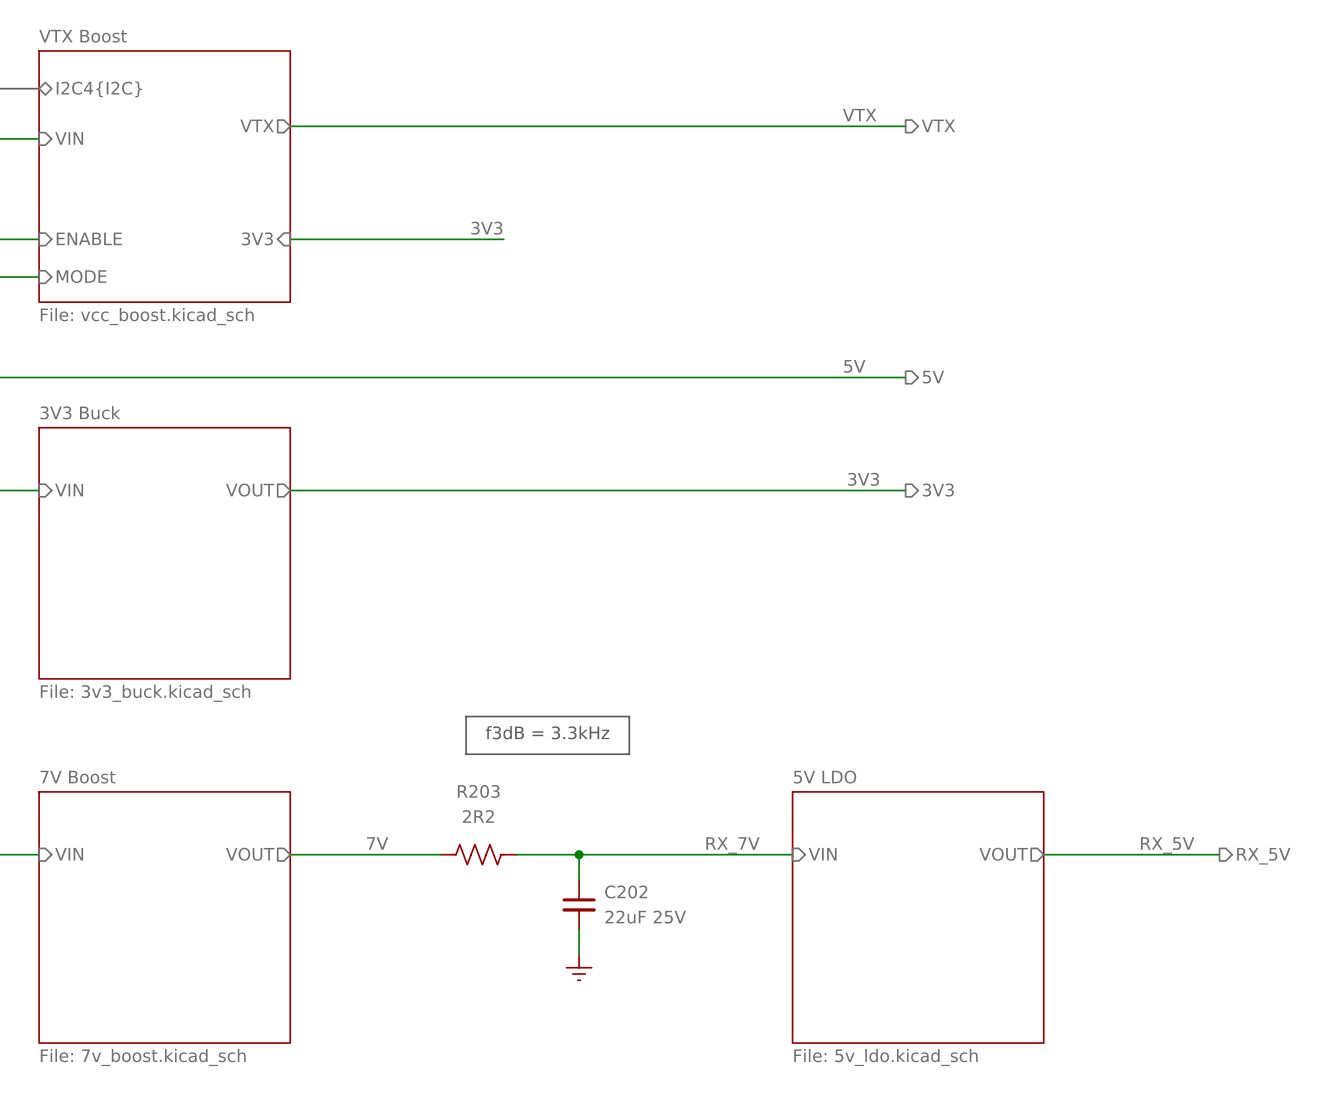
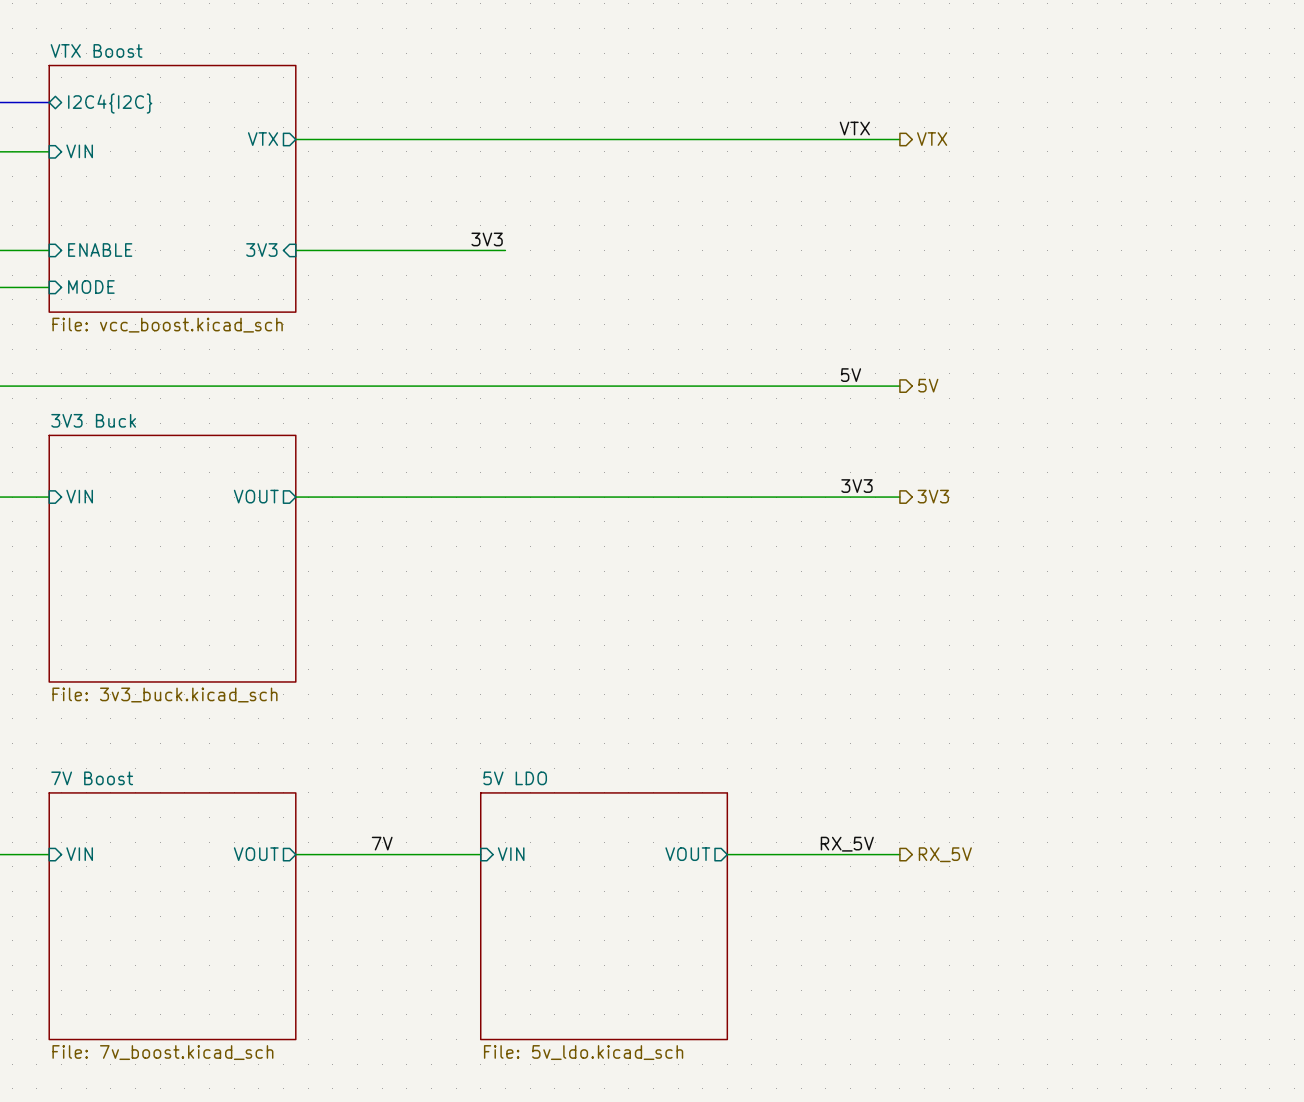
line: (466, 716) (629, 716) (629, 754) (466, 754) (466, 716) -> none
text: f3dB = 3.3kHz (547, 732) -> none
label: RX_7V (733, 845) -> none
label: none -> RX_5V (847, 844)
label: RX_5V (1167, 845) -> none
R203: 2R2 (478, 854) -> none
sheet pin: none -> VIN (511, 854)
wire: (516, 854) (729, 854) -> none
wire: (579, 854) (579, 879) -> none
junction: (579, 854) -> none
sheet pin: none -> VOUT (687, 854)
wire: none -> (788, 854) (899, 854)
sheet pin: VIN (822, 854) -> none
sheet pin: VOUT (1003, 854) -> none
wire: (1043, 854) (1219, 854) -> none
hierarchical label: none -> RX_5V (945, 854)
hierarchical label: RX_5V (1263, 856) -> none
C202: 22uF 25V (579, 904) -> none
sheet 5V LDO position: (918, 917) -> (604, 916)
wire: (579, 930) (579, 955) -> none
power symbol: (579, 967) -> none

